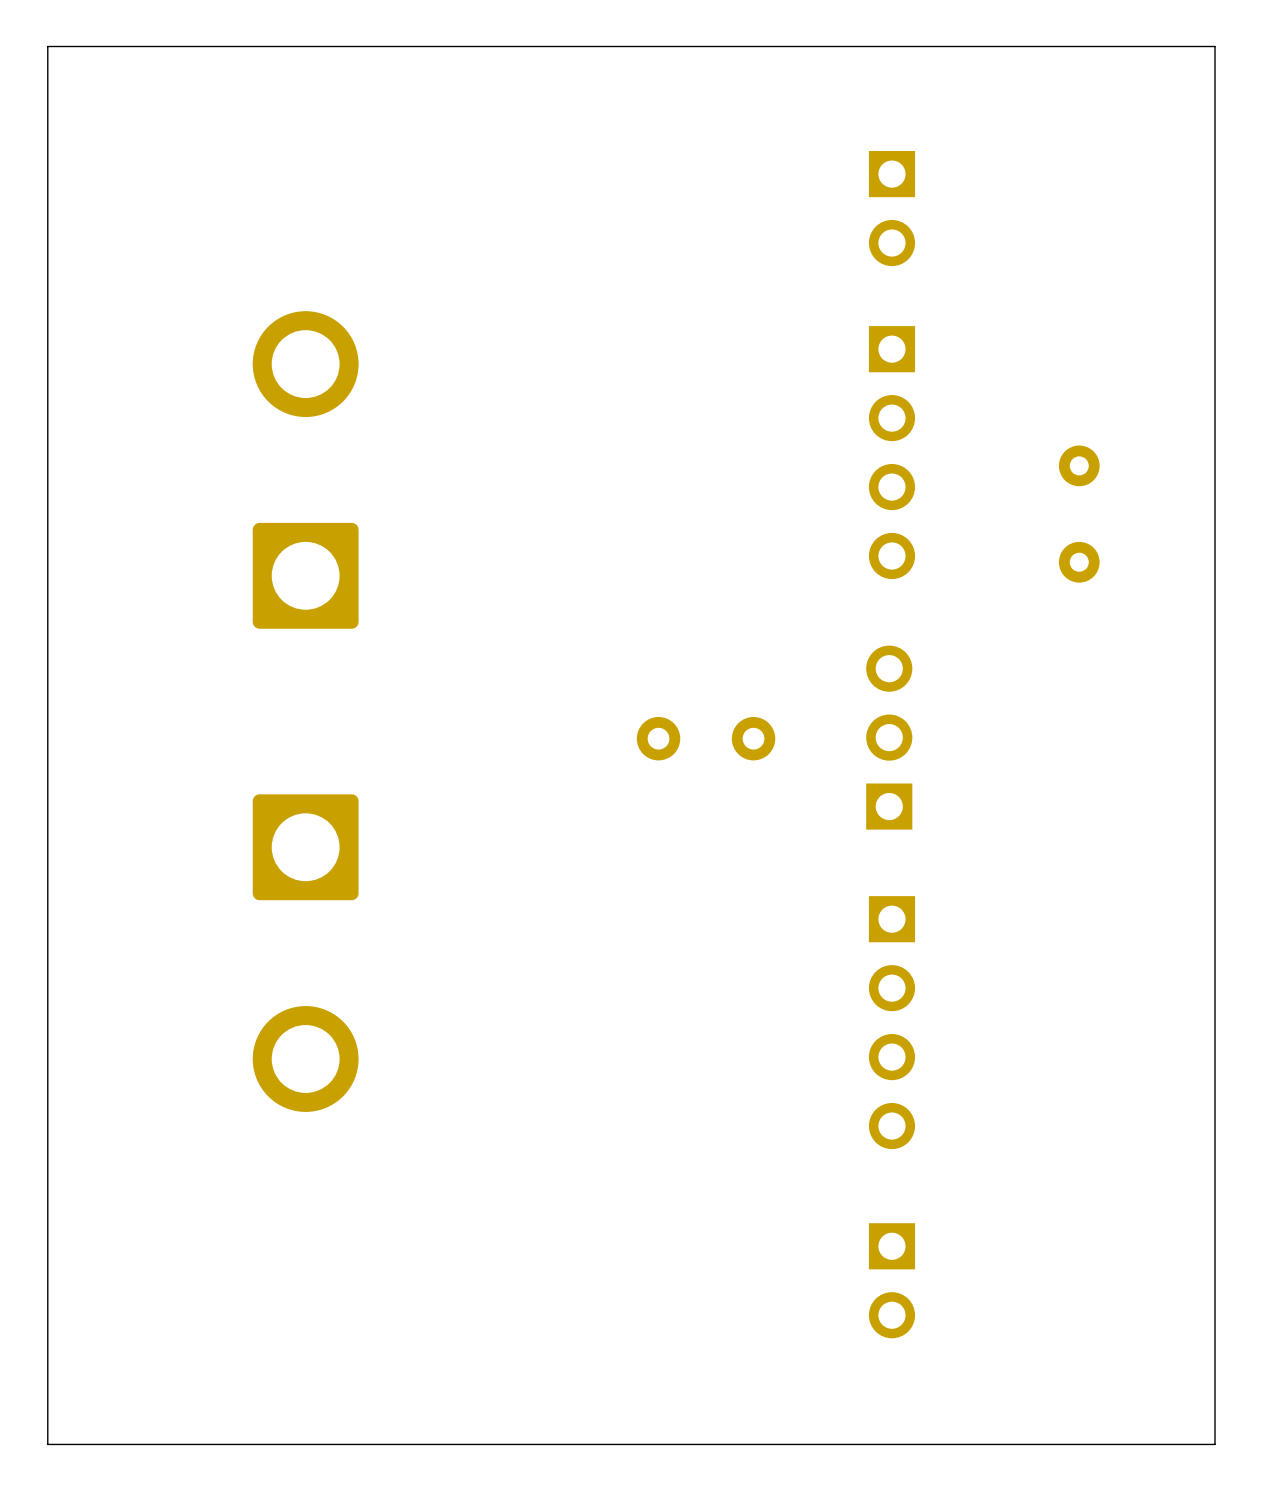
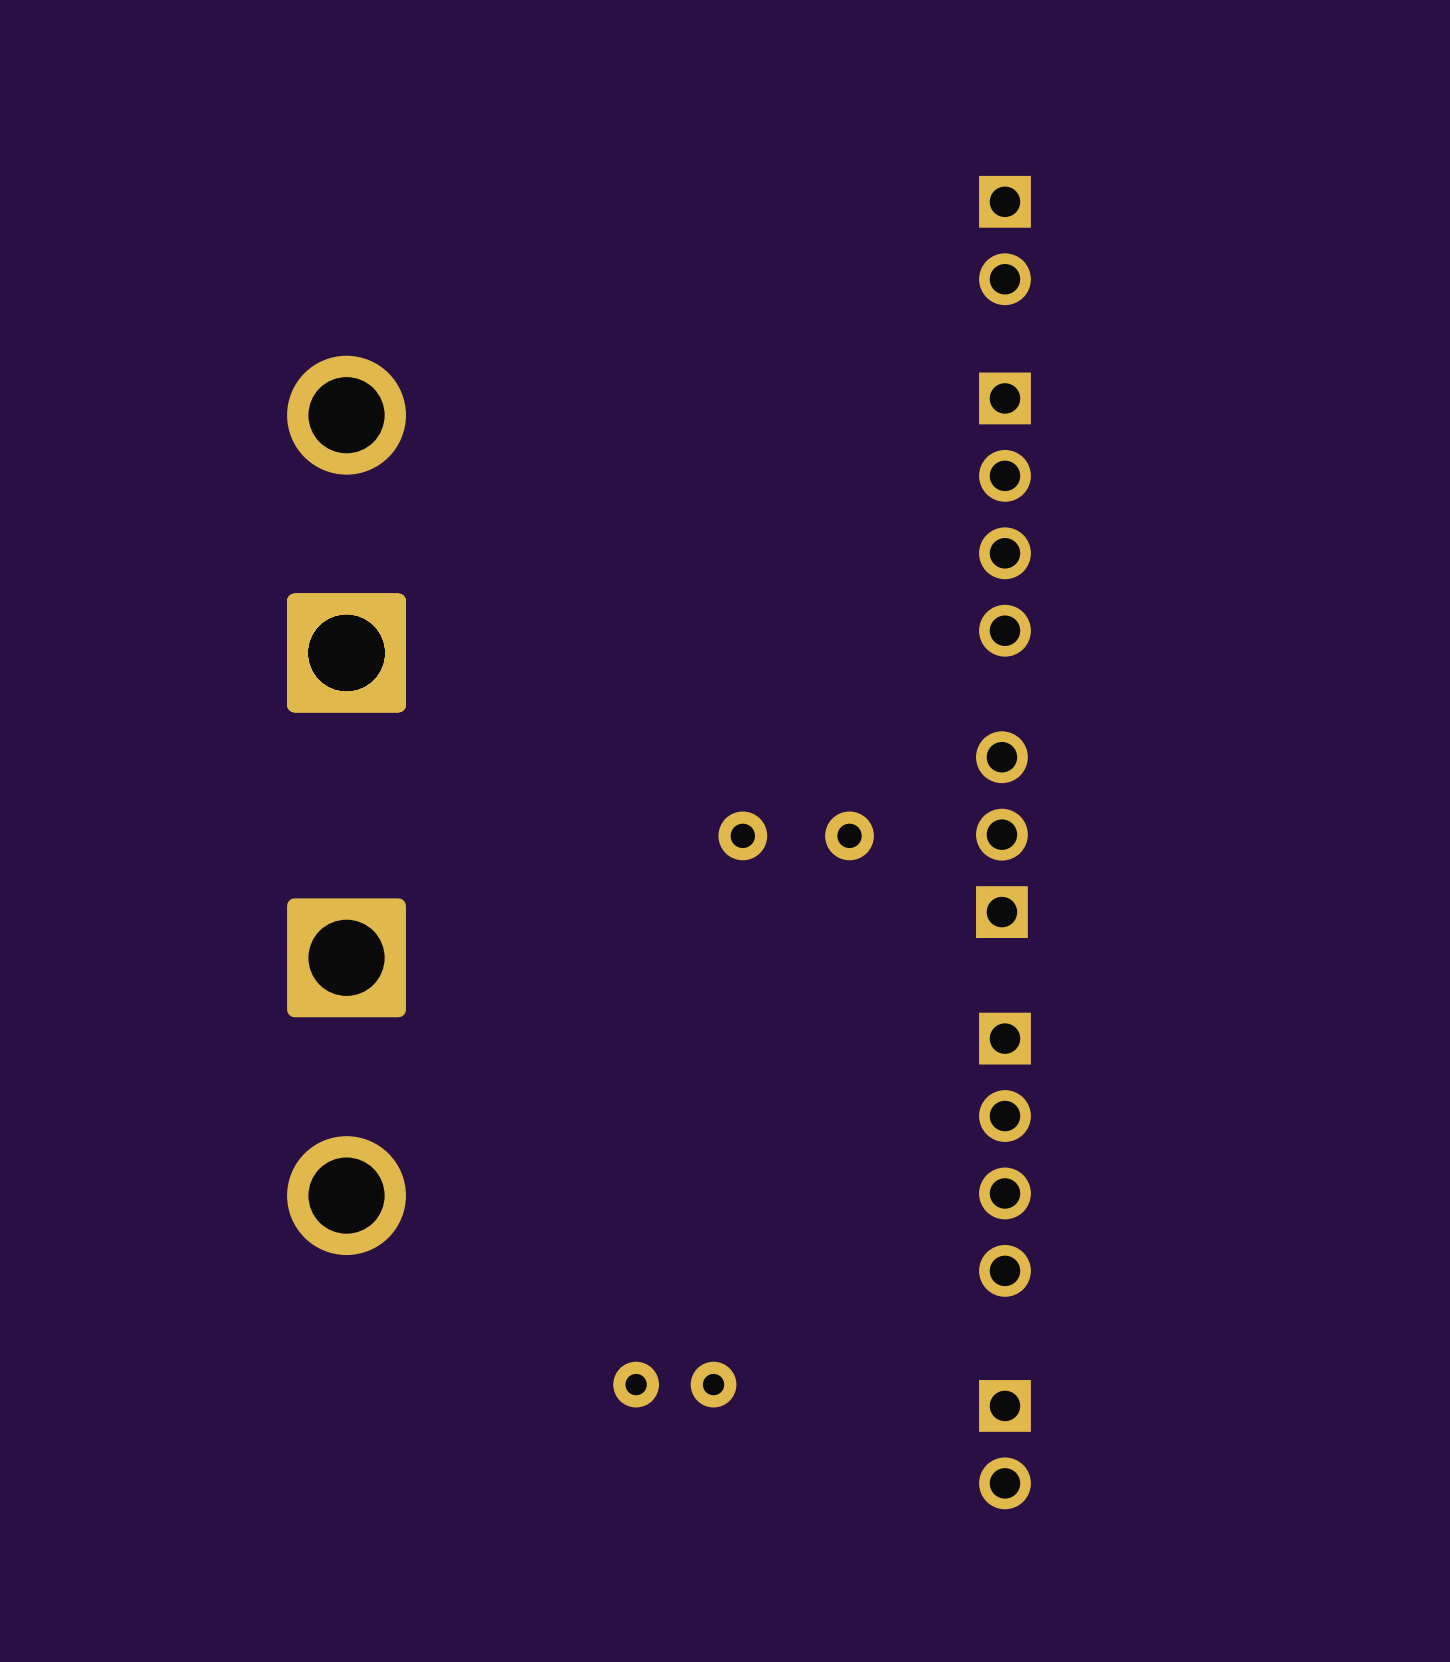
board edge: (1214, 46) (47, 46) (47, 1444) (1214, 1444) (1214, 46) -> none
part: (1079, 465) -> none
part: (1079, 562) -> none
part: none -> (346, 652)
part: none -> (636, 1384)
part: none -> (713, 1384)

